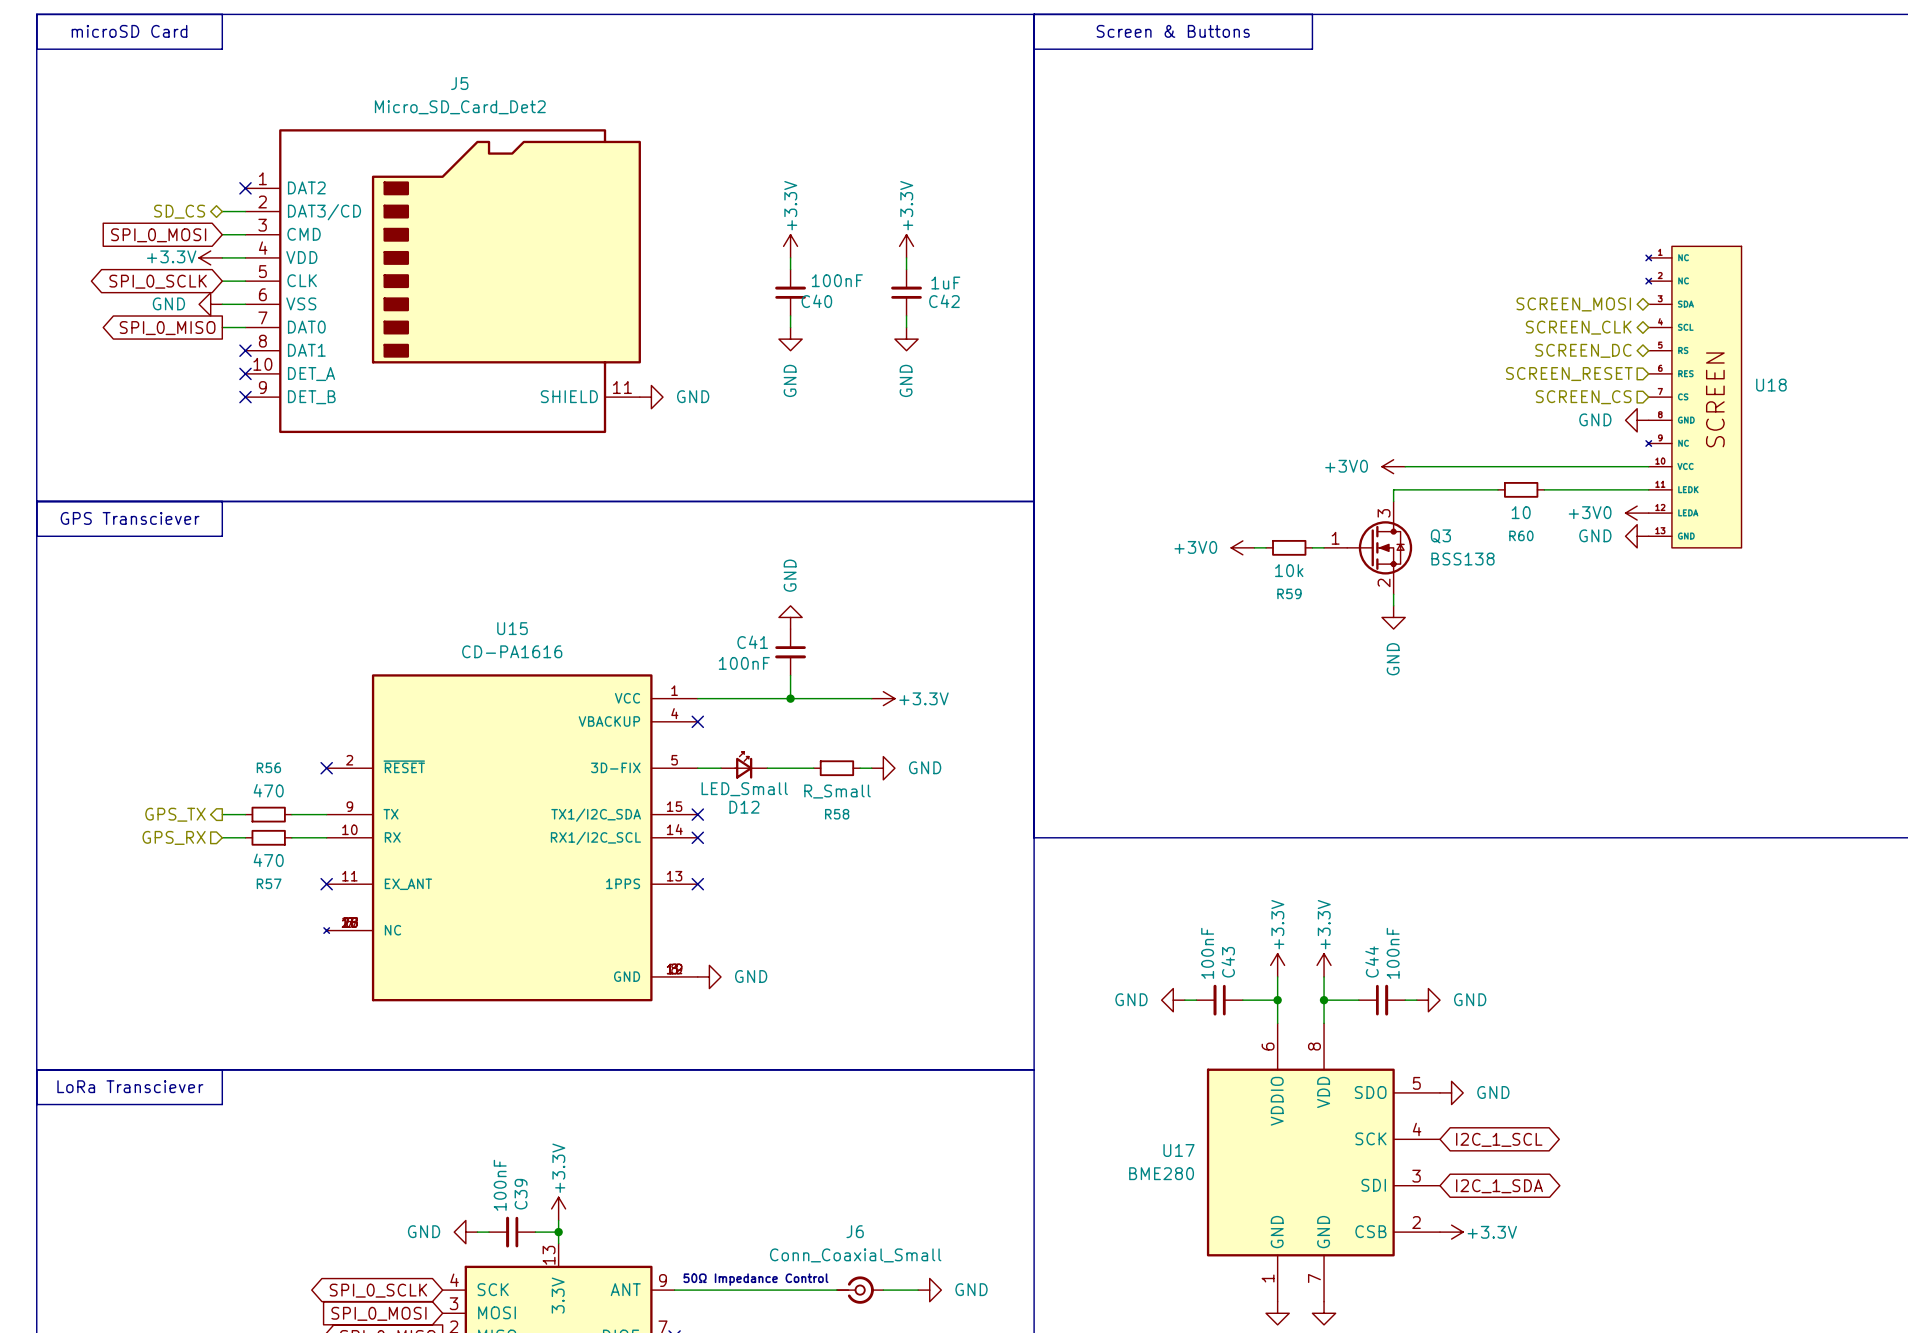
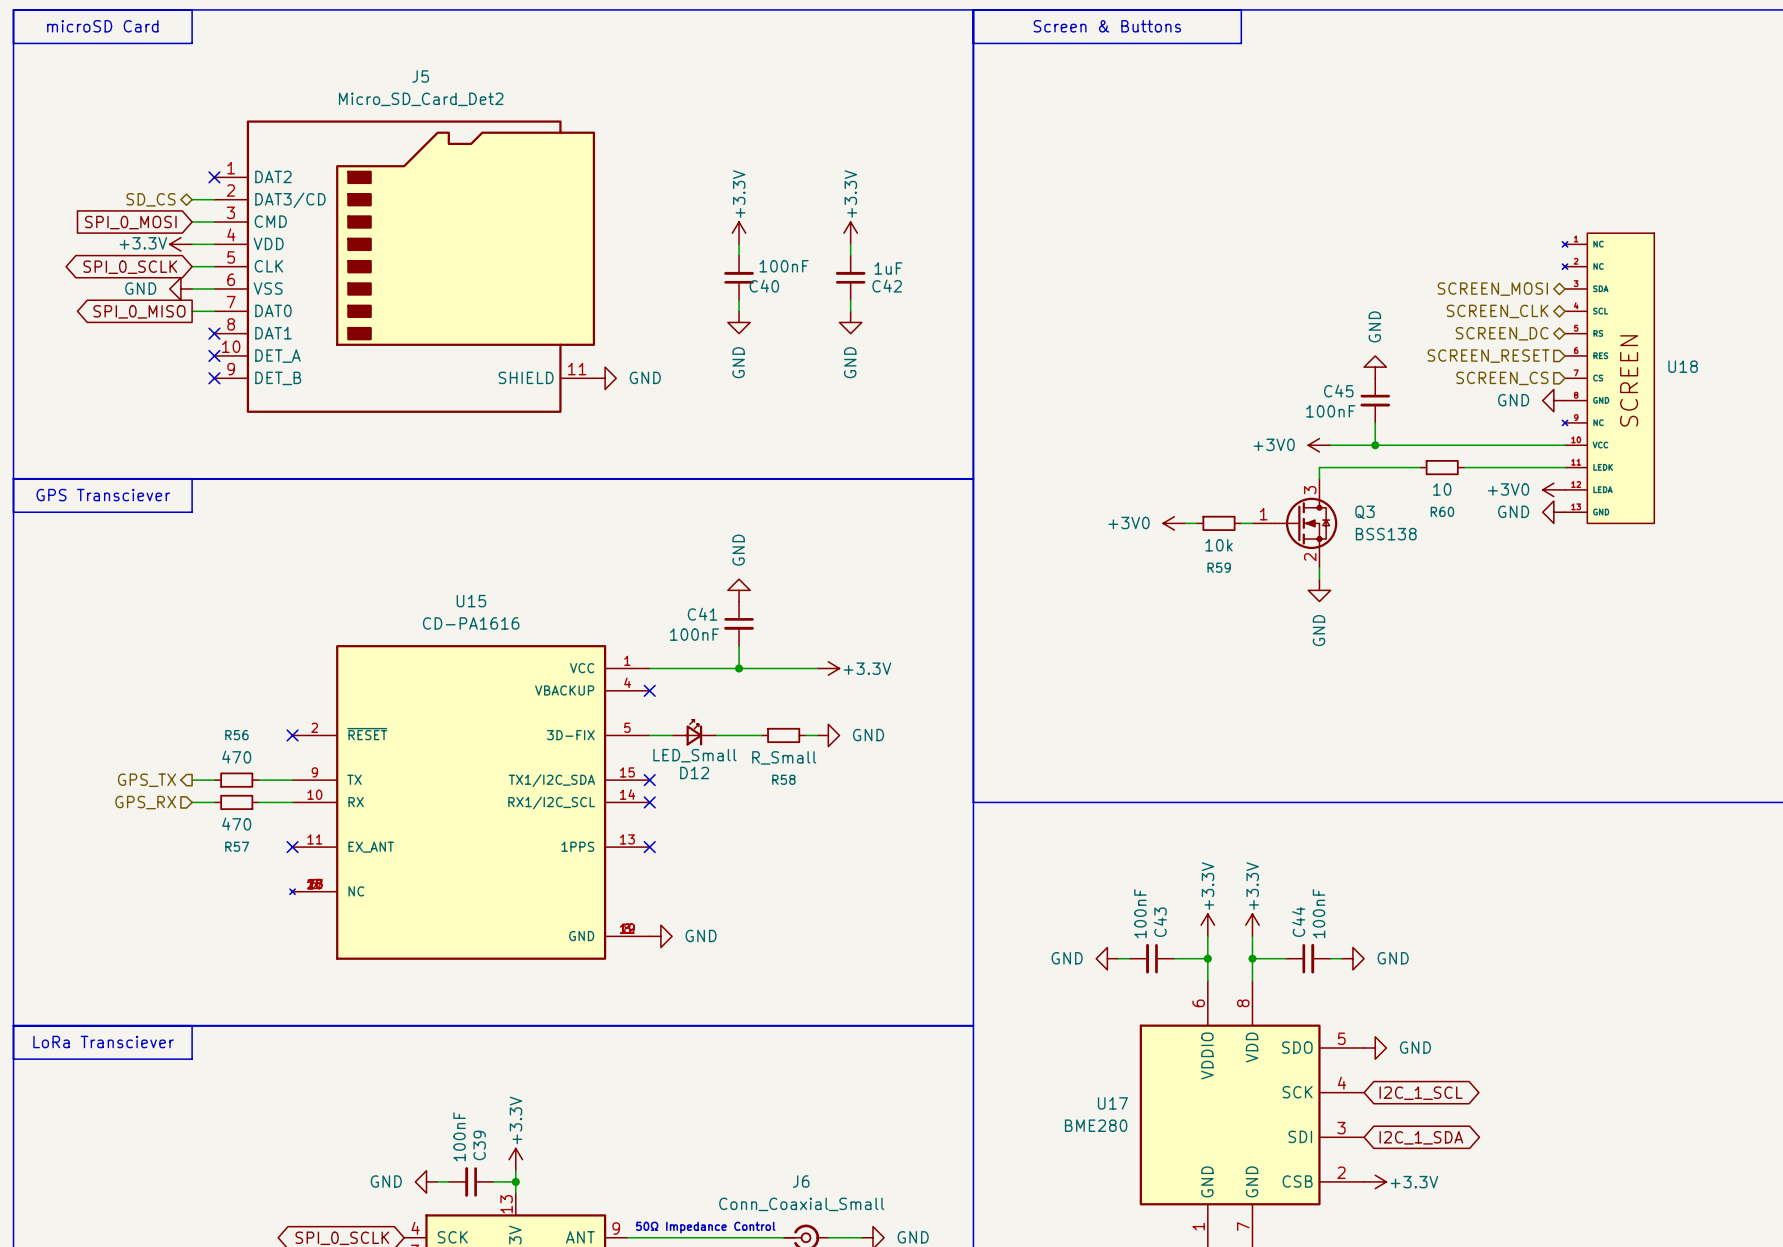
power symbol: none -> GND (1375, 367)
C45: none -> 100nF (1375, 400)
wire: none -> (1375, 422) (1375, 445)
junction: none -> (1375, 445)

